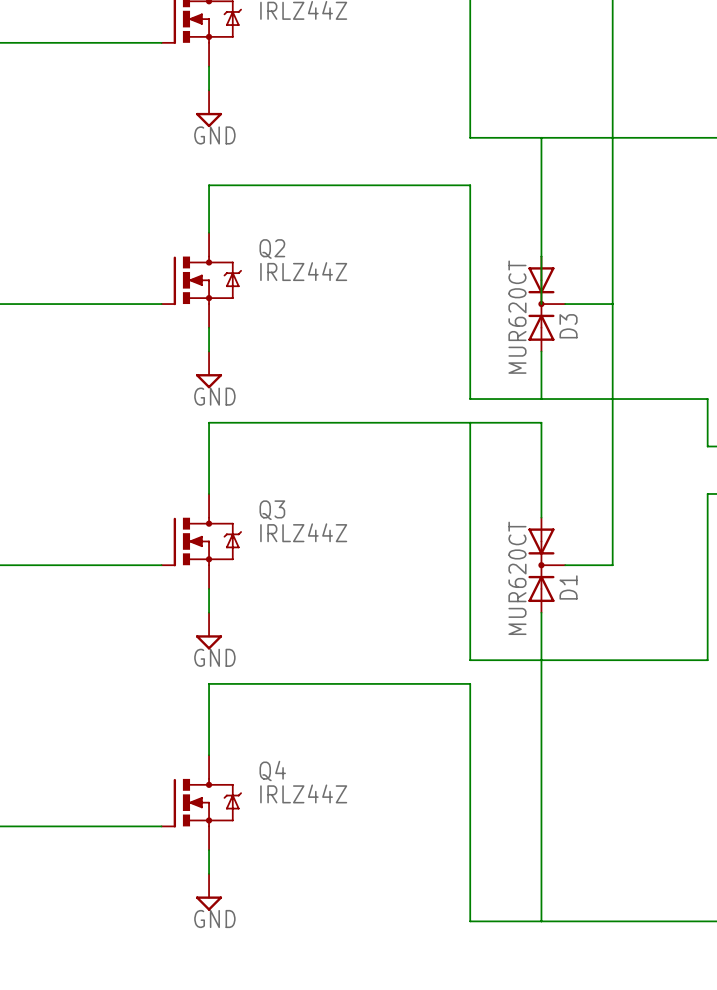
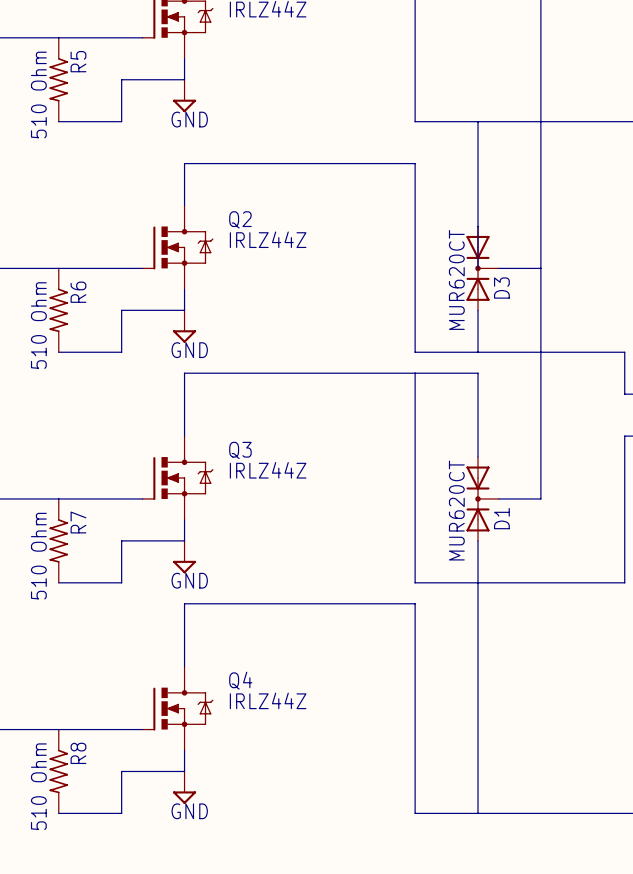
R5: none -> 510 Ohm (58, 79)
wire: none -> (184, 79) (121, 79) (121, 121) (58, 121)
R6: none -> 510 Ohm (58, 310)
wire: none -> (184, 310) (121, 310) (121, 352) (58, 352)
R7: none -> 510 Ohm (58, 540)
wire: none -> (184, 540) (121, 540) (121, 582) (58, 582)
R8: none -> 510 Ohm (58, 771)
wire: none -> (184, 771) (121, 771) (121, 813) (58, 813)

